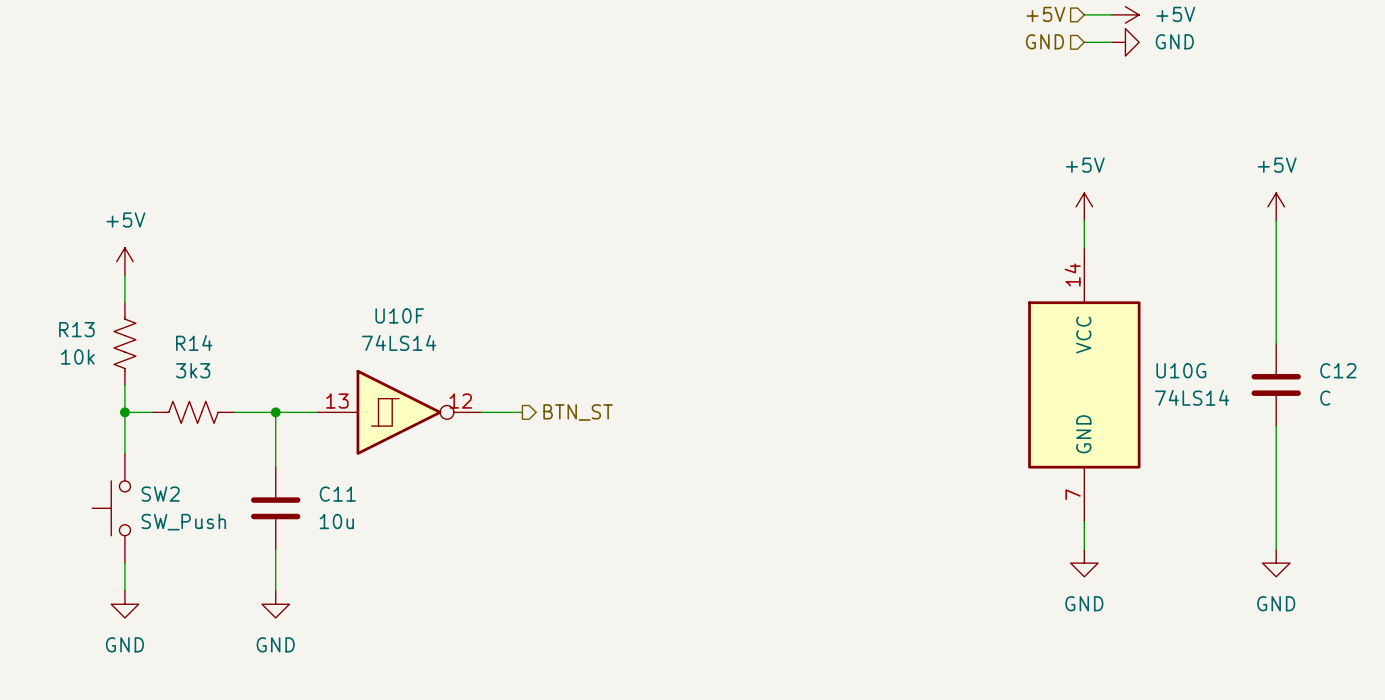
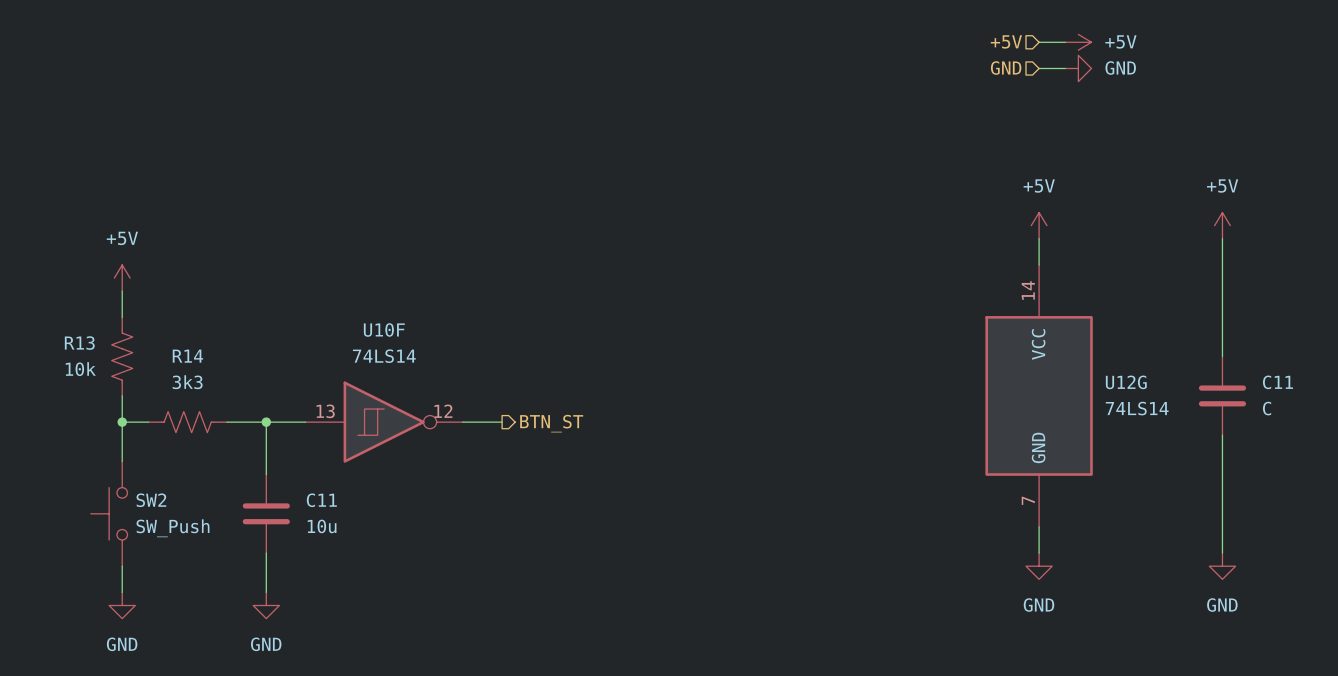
U10G name: U10G (1181, 370) -> U12G (1126, 382)
C12 name: C12 (1338, 370) -> C11 (1277, 382)

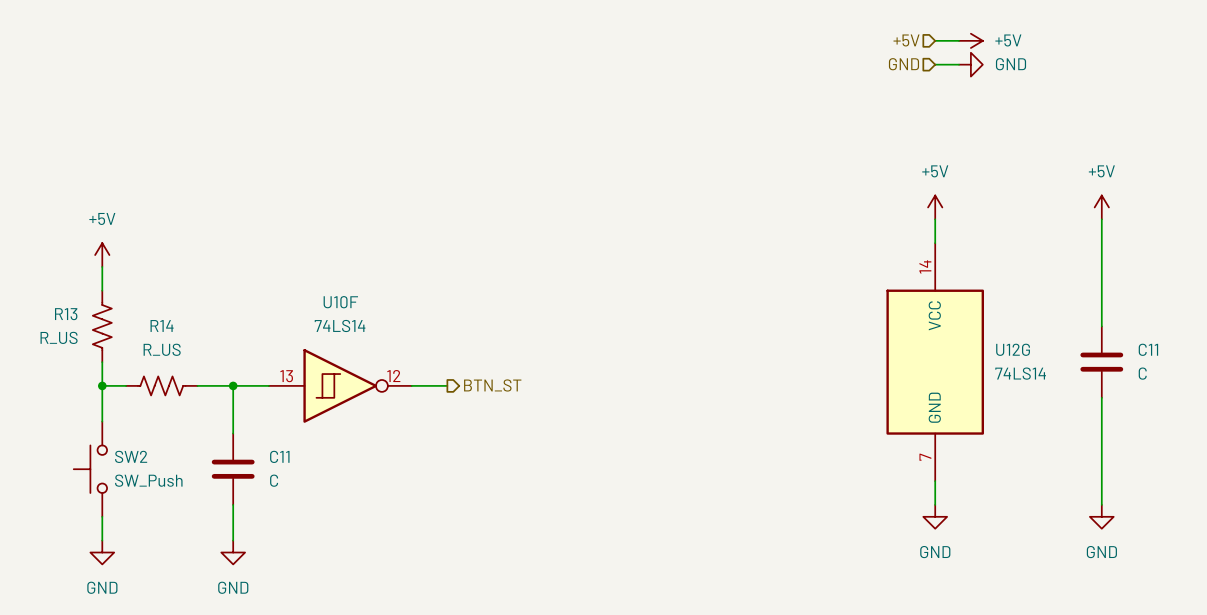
R13 value: 10k (80, 369) -> R_US (59, 337)
R14 value: 3k3 (187, 382) -> R_US (162, 349)
C11 value: 10u (322, 526) -> C (274, 480)

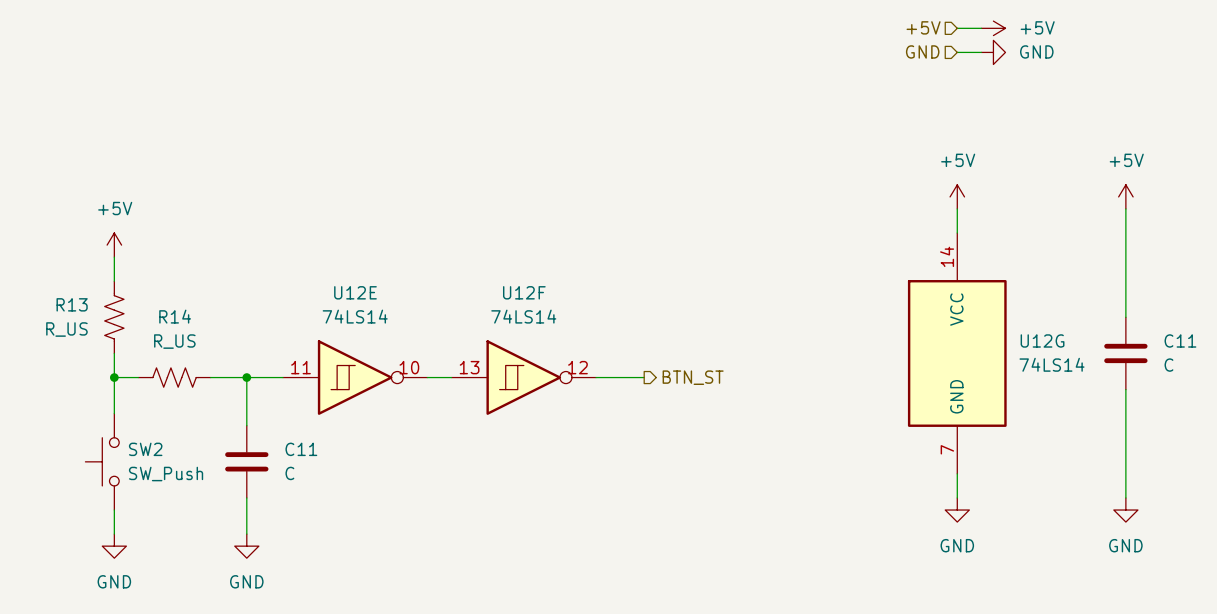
U10F name: U10F (340, 302) -> U12E (355, 292)
U10F pin number: 13 (286, 376) -> 11 (300, 367)
U10F pin number: 12 (393, 376) -> 10 (409, 367)
hierarchical label position: BTN_ST (492, 385) -> BTN_ST (693, 377)
U12F: none -> 74LS14 (523, 377)
wire: none -> (596, 377) (644, 377)

